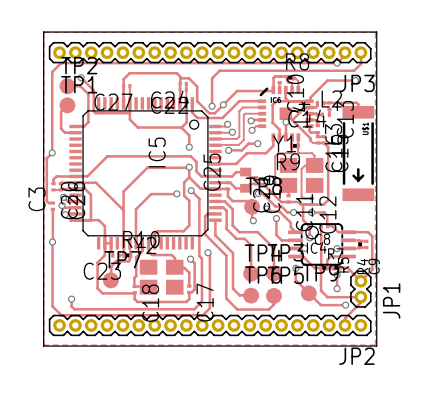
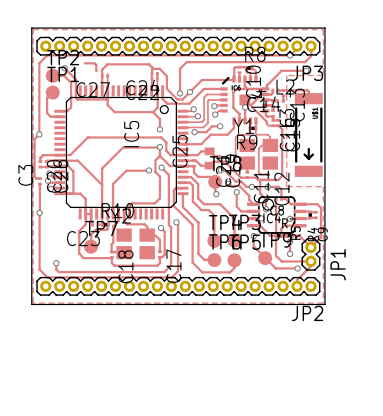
zone outline: (43, 32) (375, 32) (375, 345) (43, 345) (43, 32) -> (33, 29) (33, 303) (323, 303) (323, 186) (286, 186) (286, 75) (323, 75) (323, 29) (33, 29)
track: none -> (84, 63) (94, 63) (96, 70)

